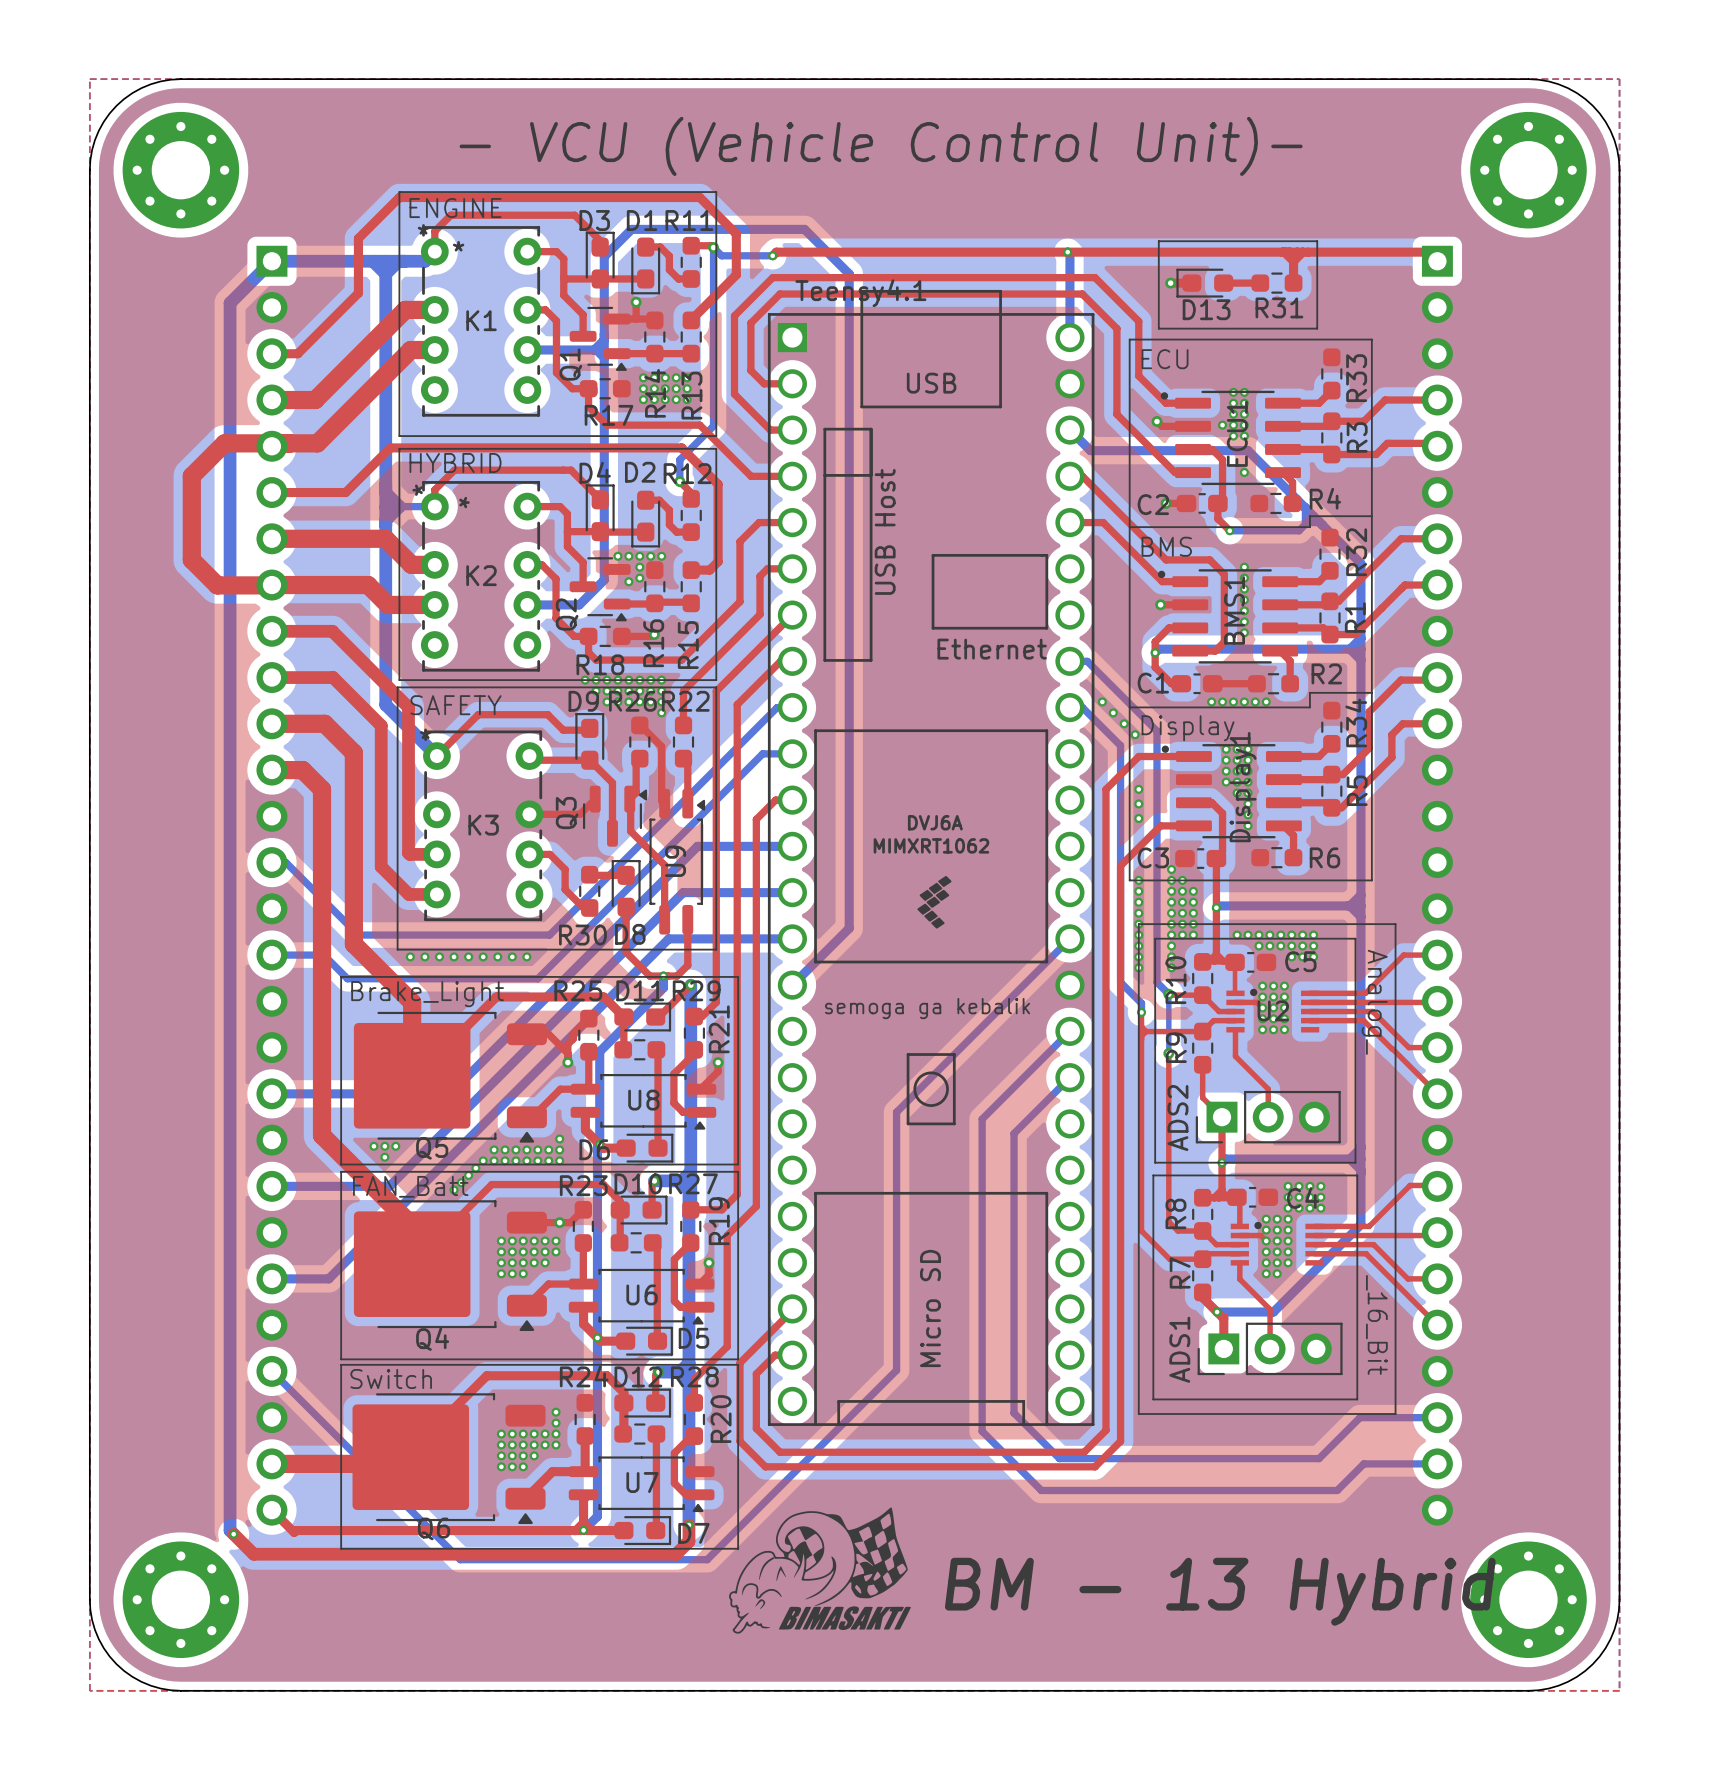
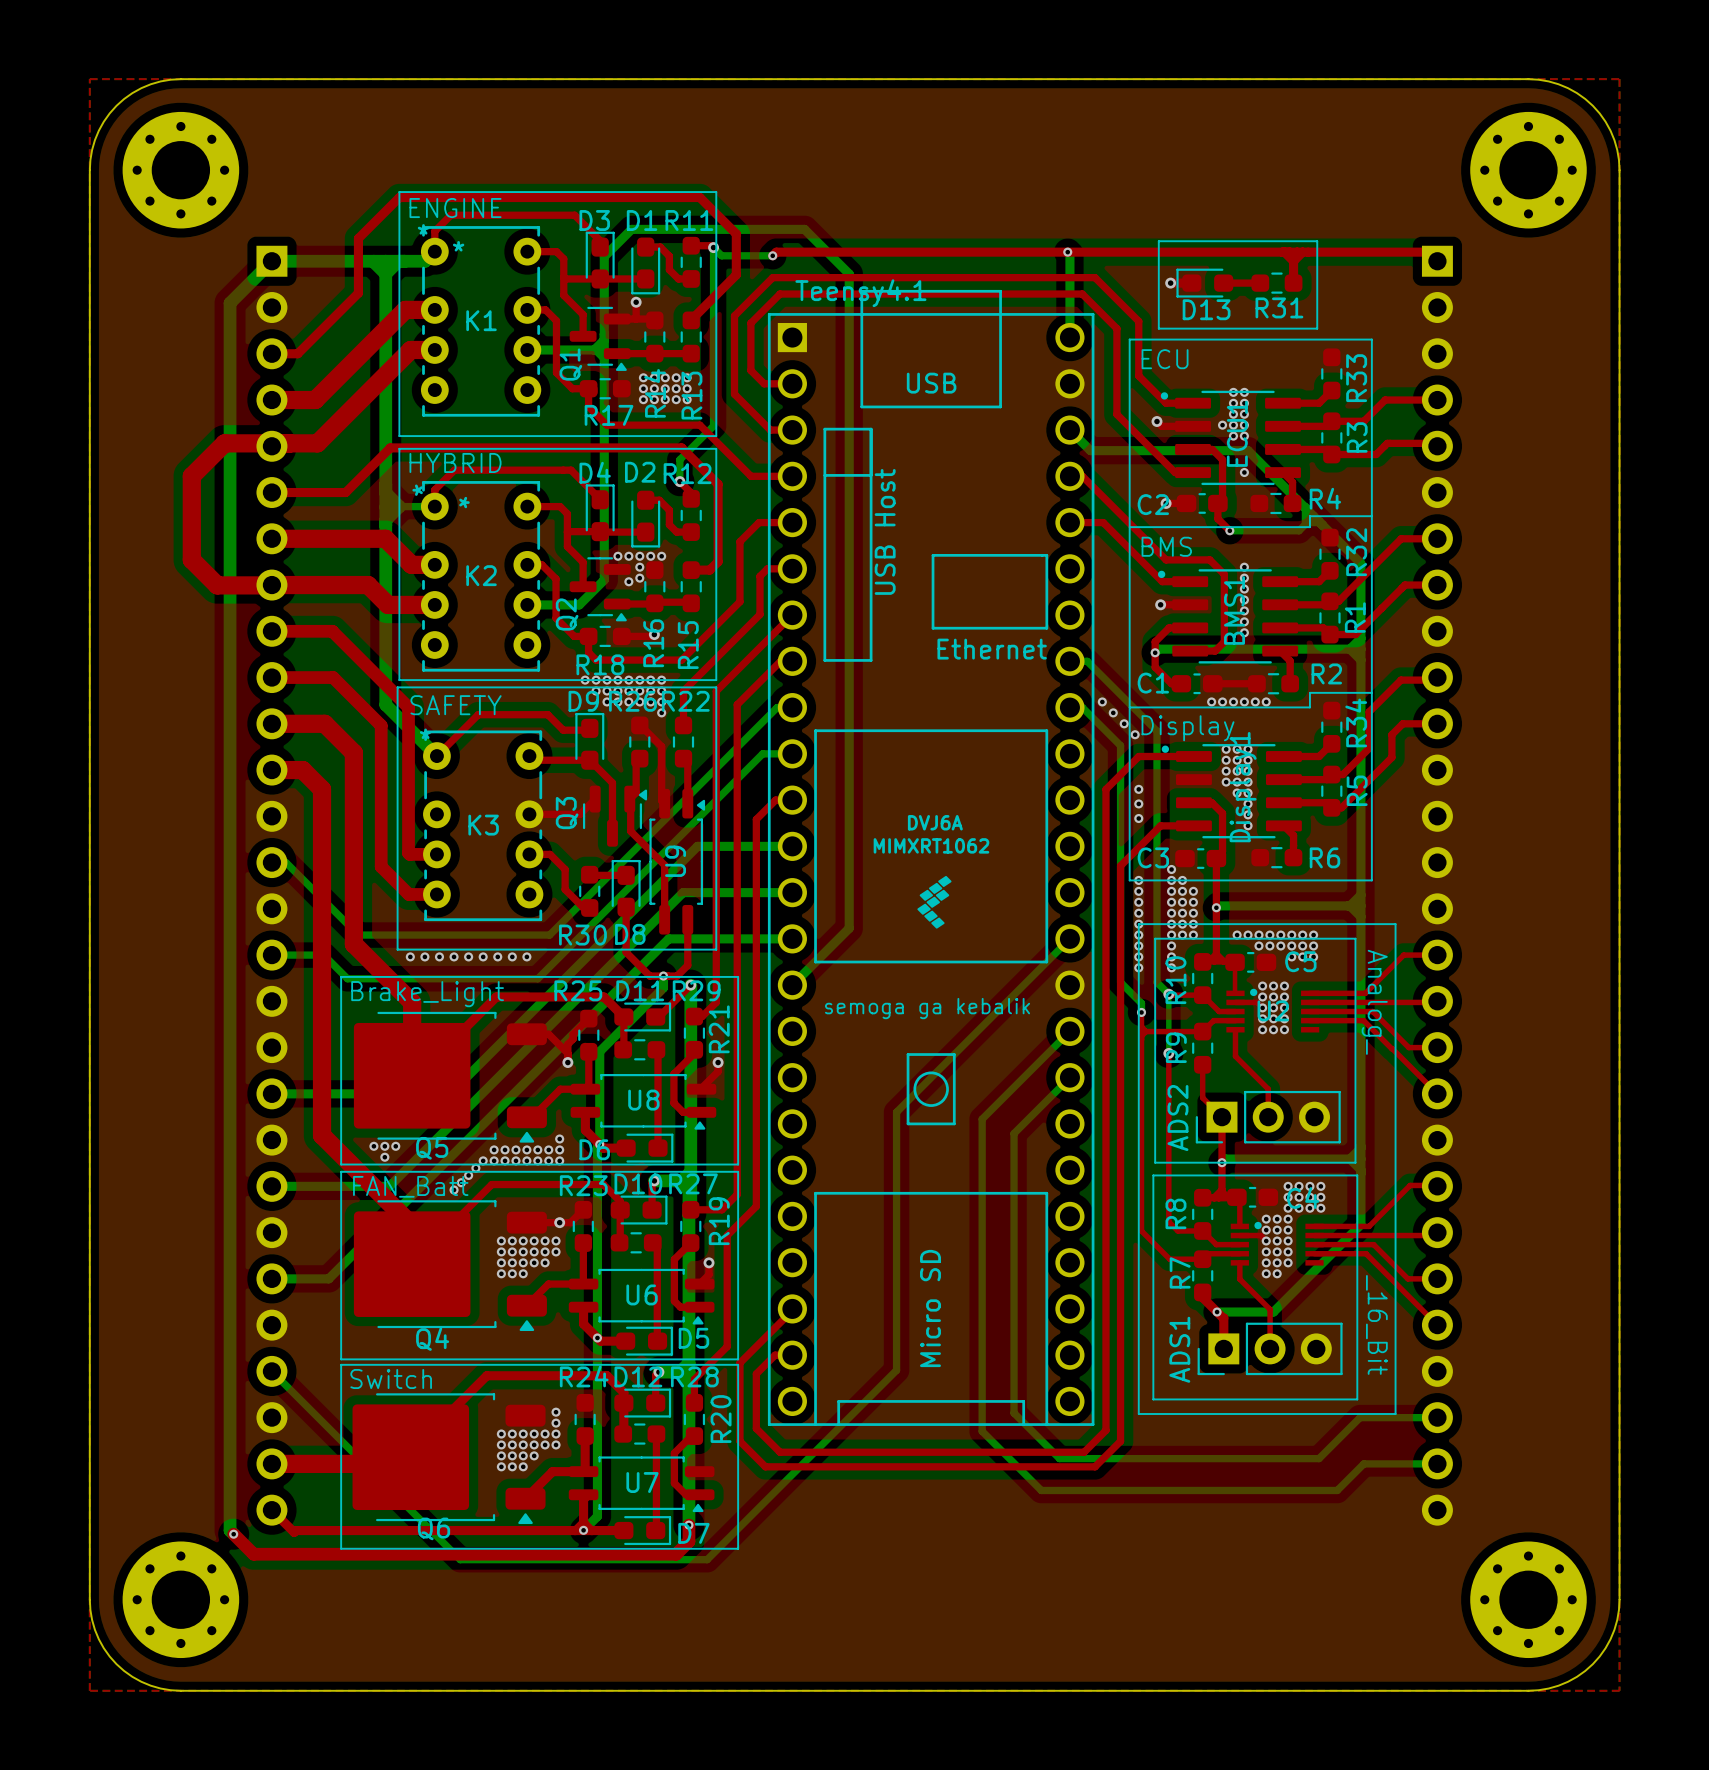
text: - VCU (Vehicle Control Unit)- (881, 146) -> none
drawing: [729, 1507, 911, 1634] -> none
text: BM - 13 Hybrid (1220, 1591) -> none

